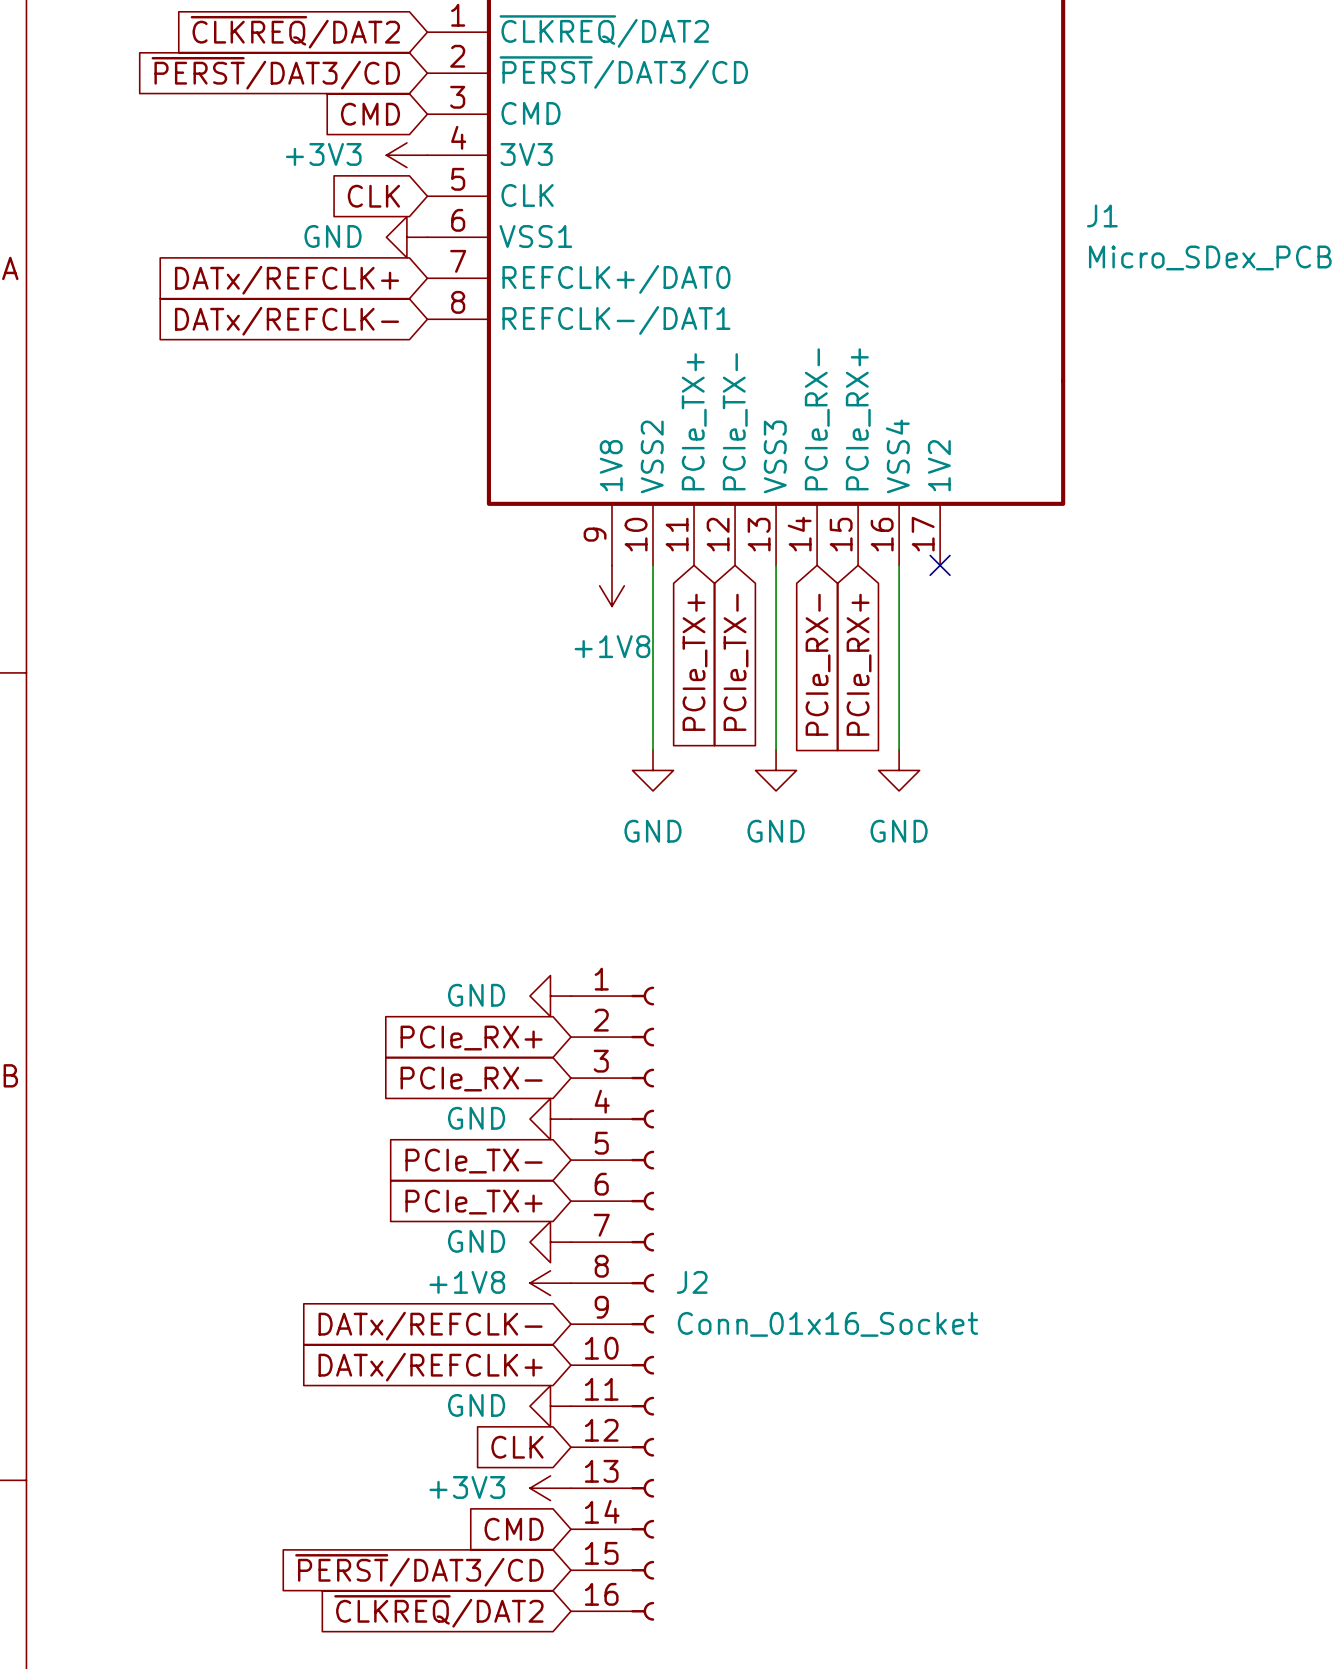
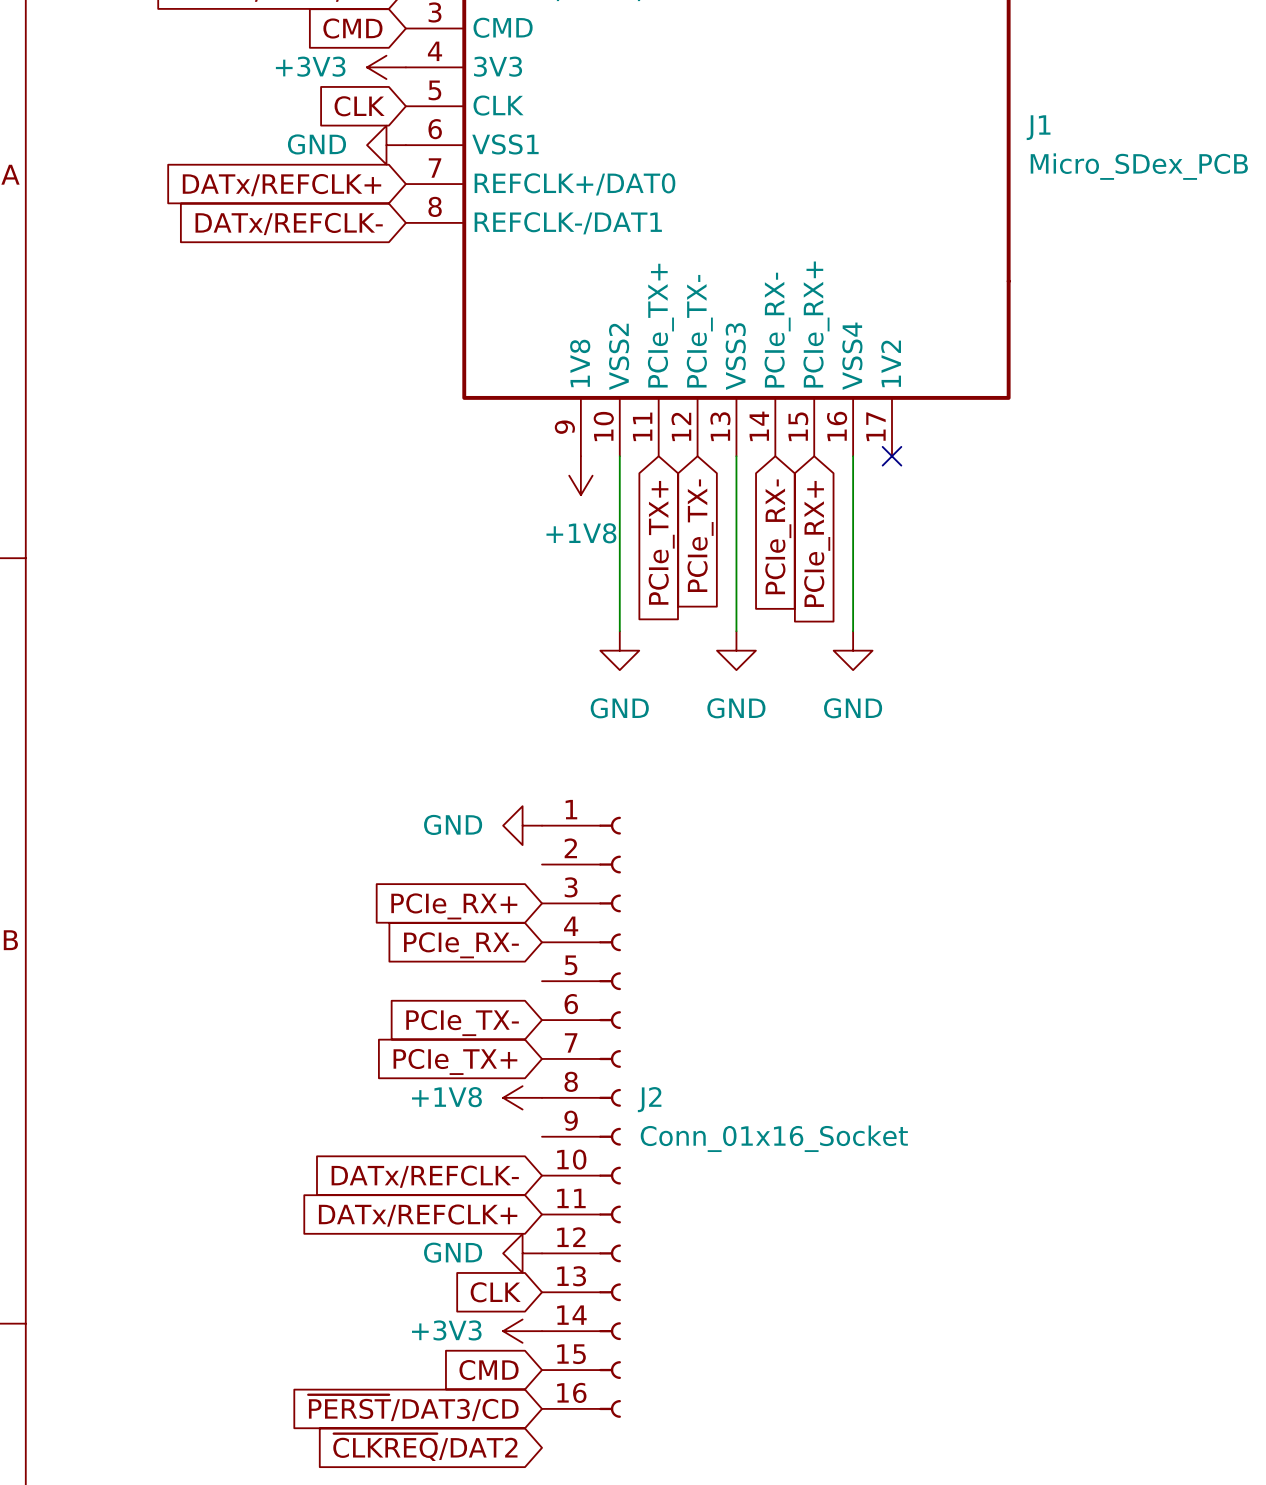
power symbol position: GND (550, 996) -> GND (522, 825)
power symbol: GND (550, 1119) -> none
power symbol: GND (550, 1242) -> +1V8 (522, 1097)
power symbol: +1V8 (550, 1283) -> none
J2 position: (612, 1303) -> (581, 1117)

